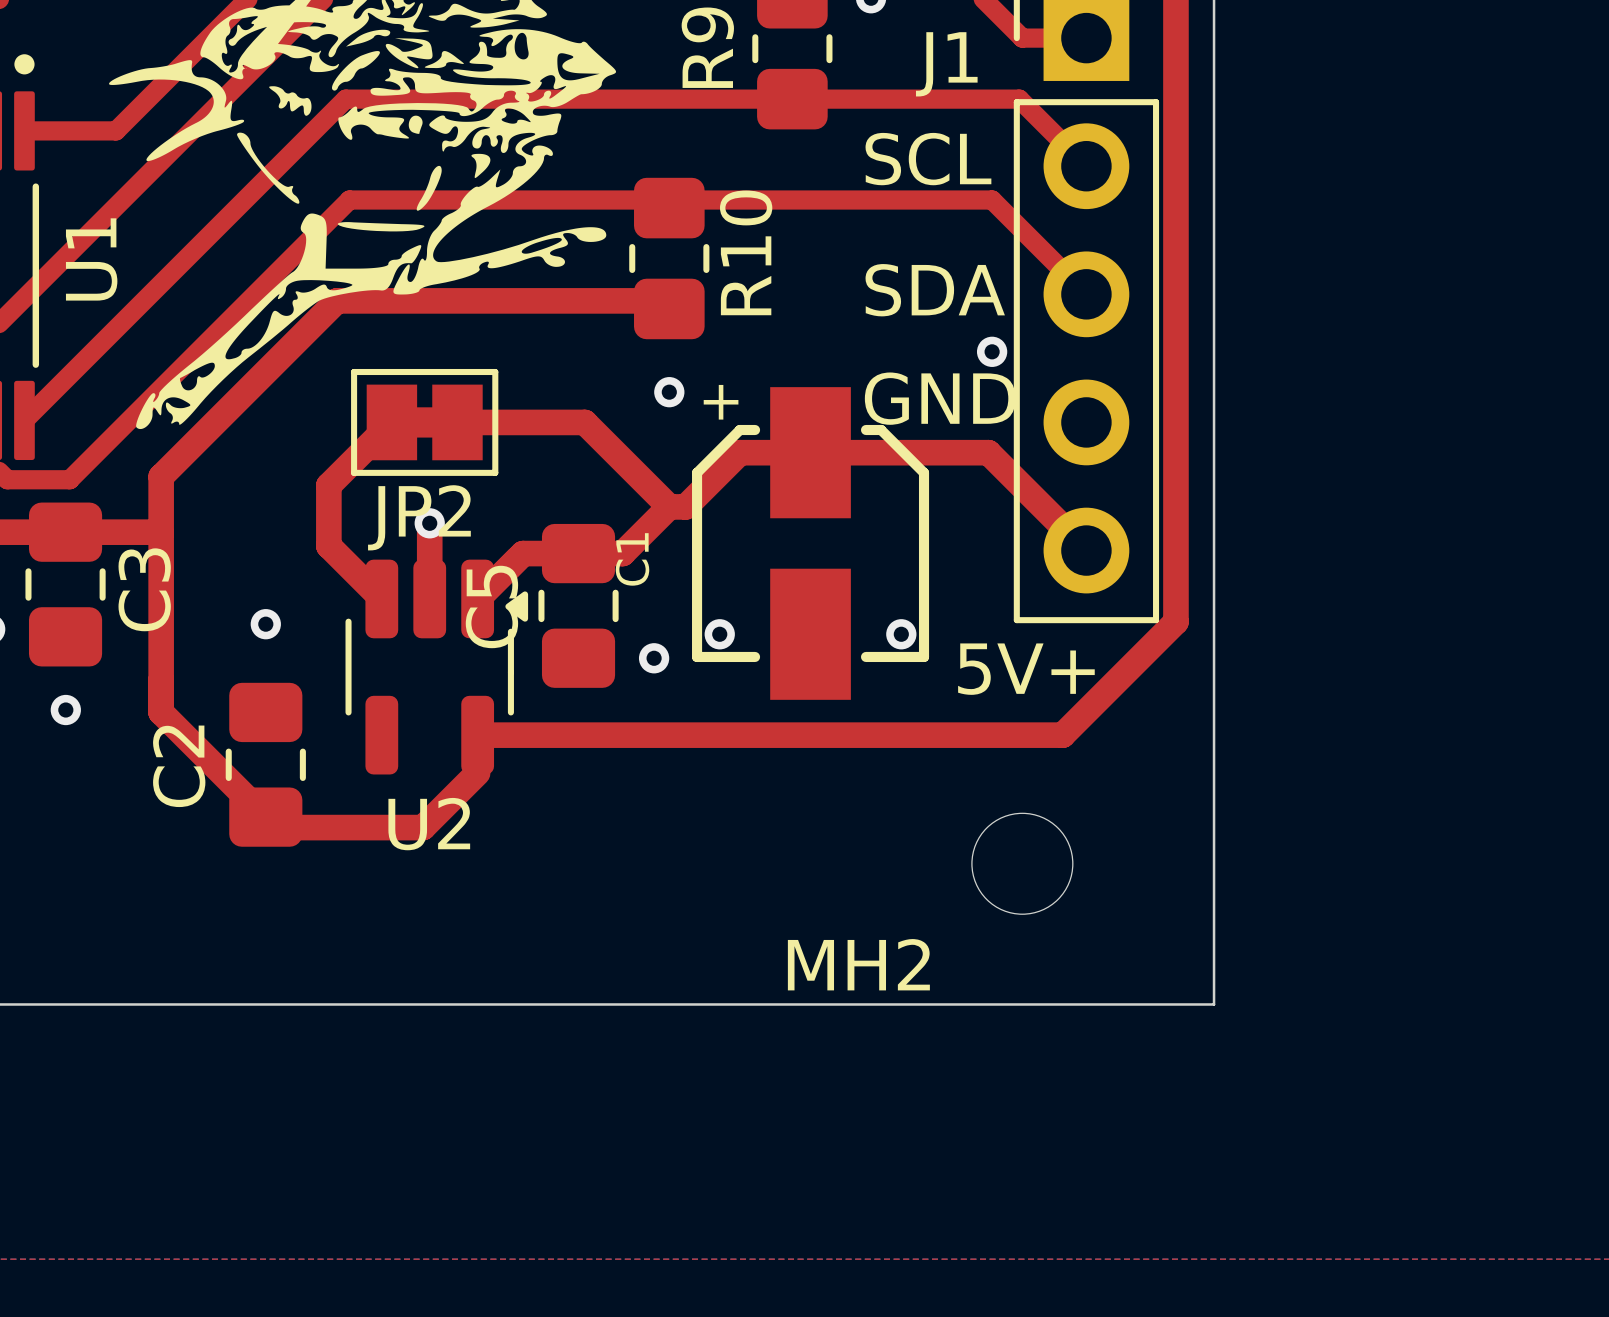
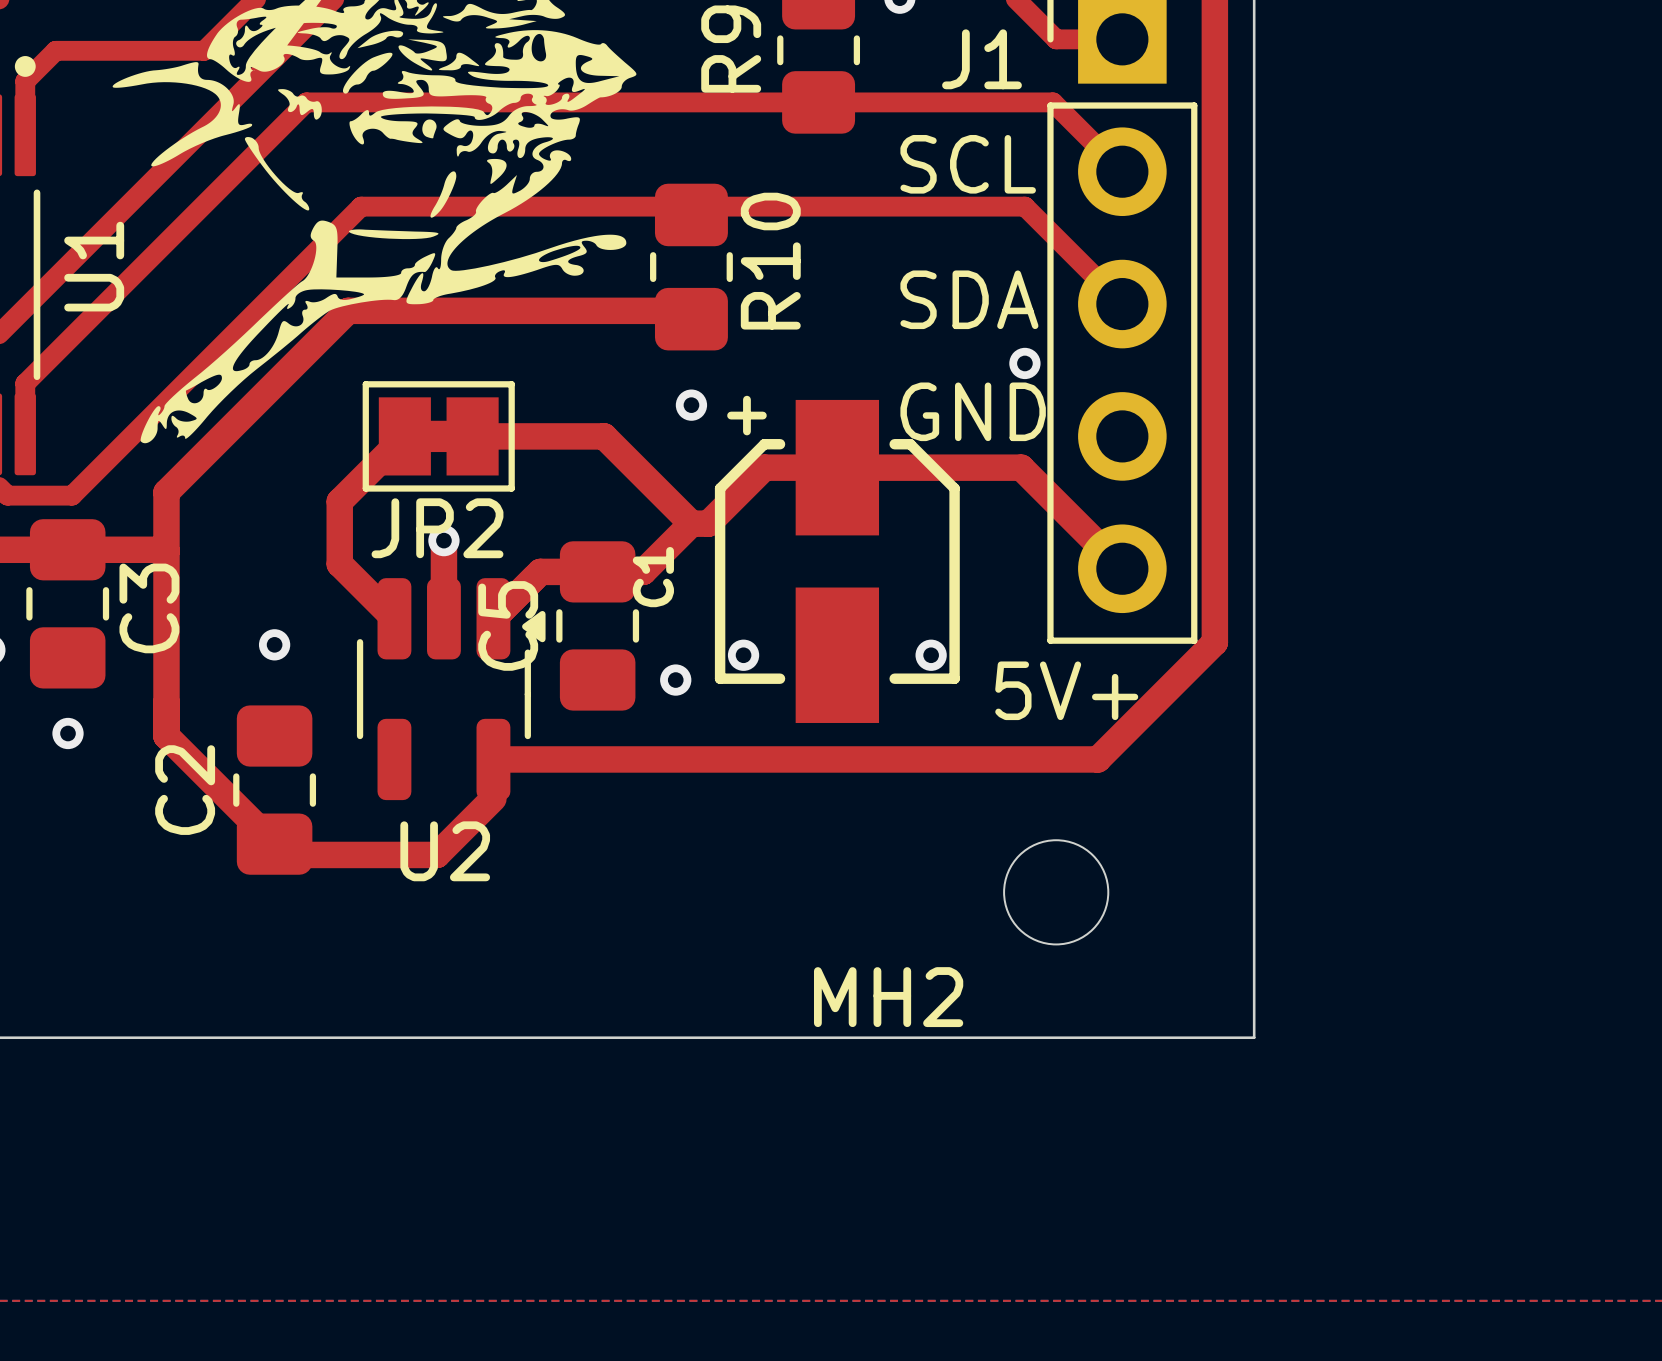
top track: (197, 49) (116, 130) (24, 130) -> (204, 50) (55, 50) (25, 81) (25, 135)
top track: (345, 99) (24, 420) -> (357, 102) (306, 102) (25, 383) (25, 434)

